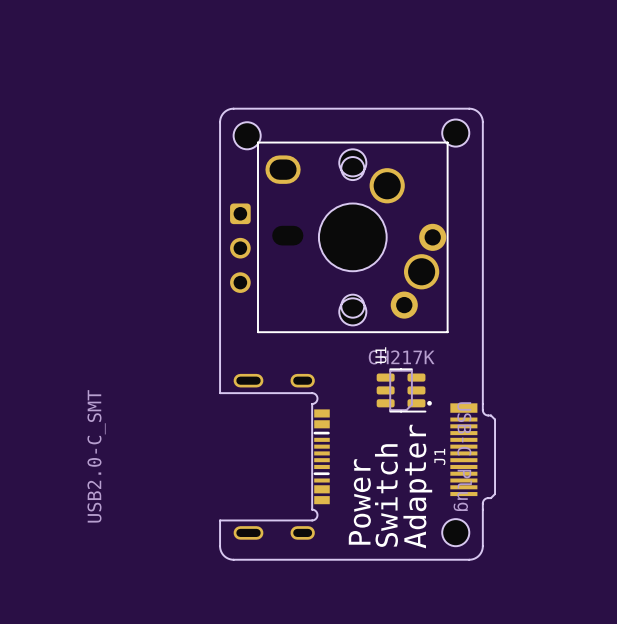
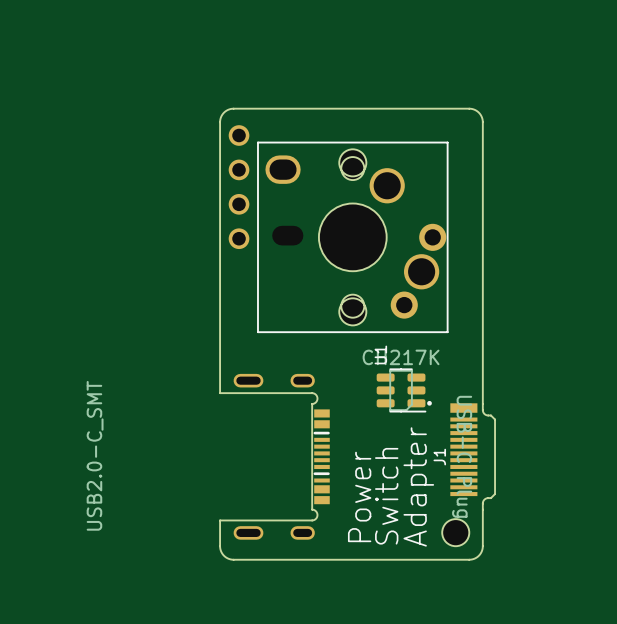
part: (455, 133) -> none
part: (247, 135) -> none
part: none -> (239, 187)
part: (240, 248) -> none

